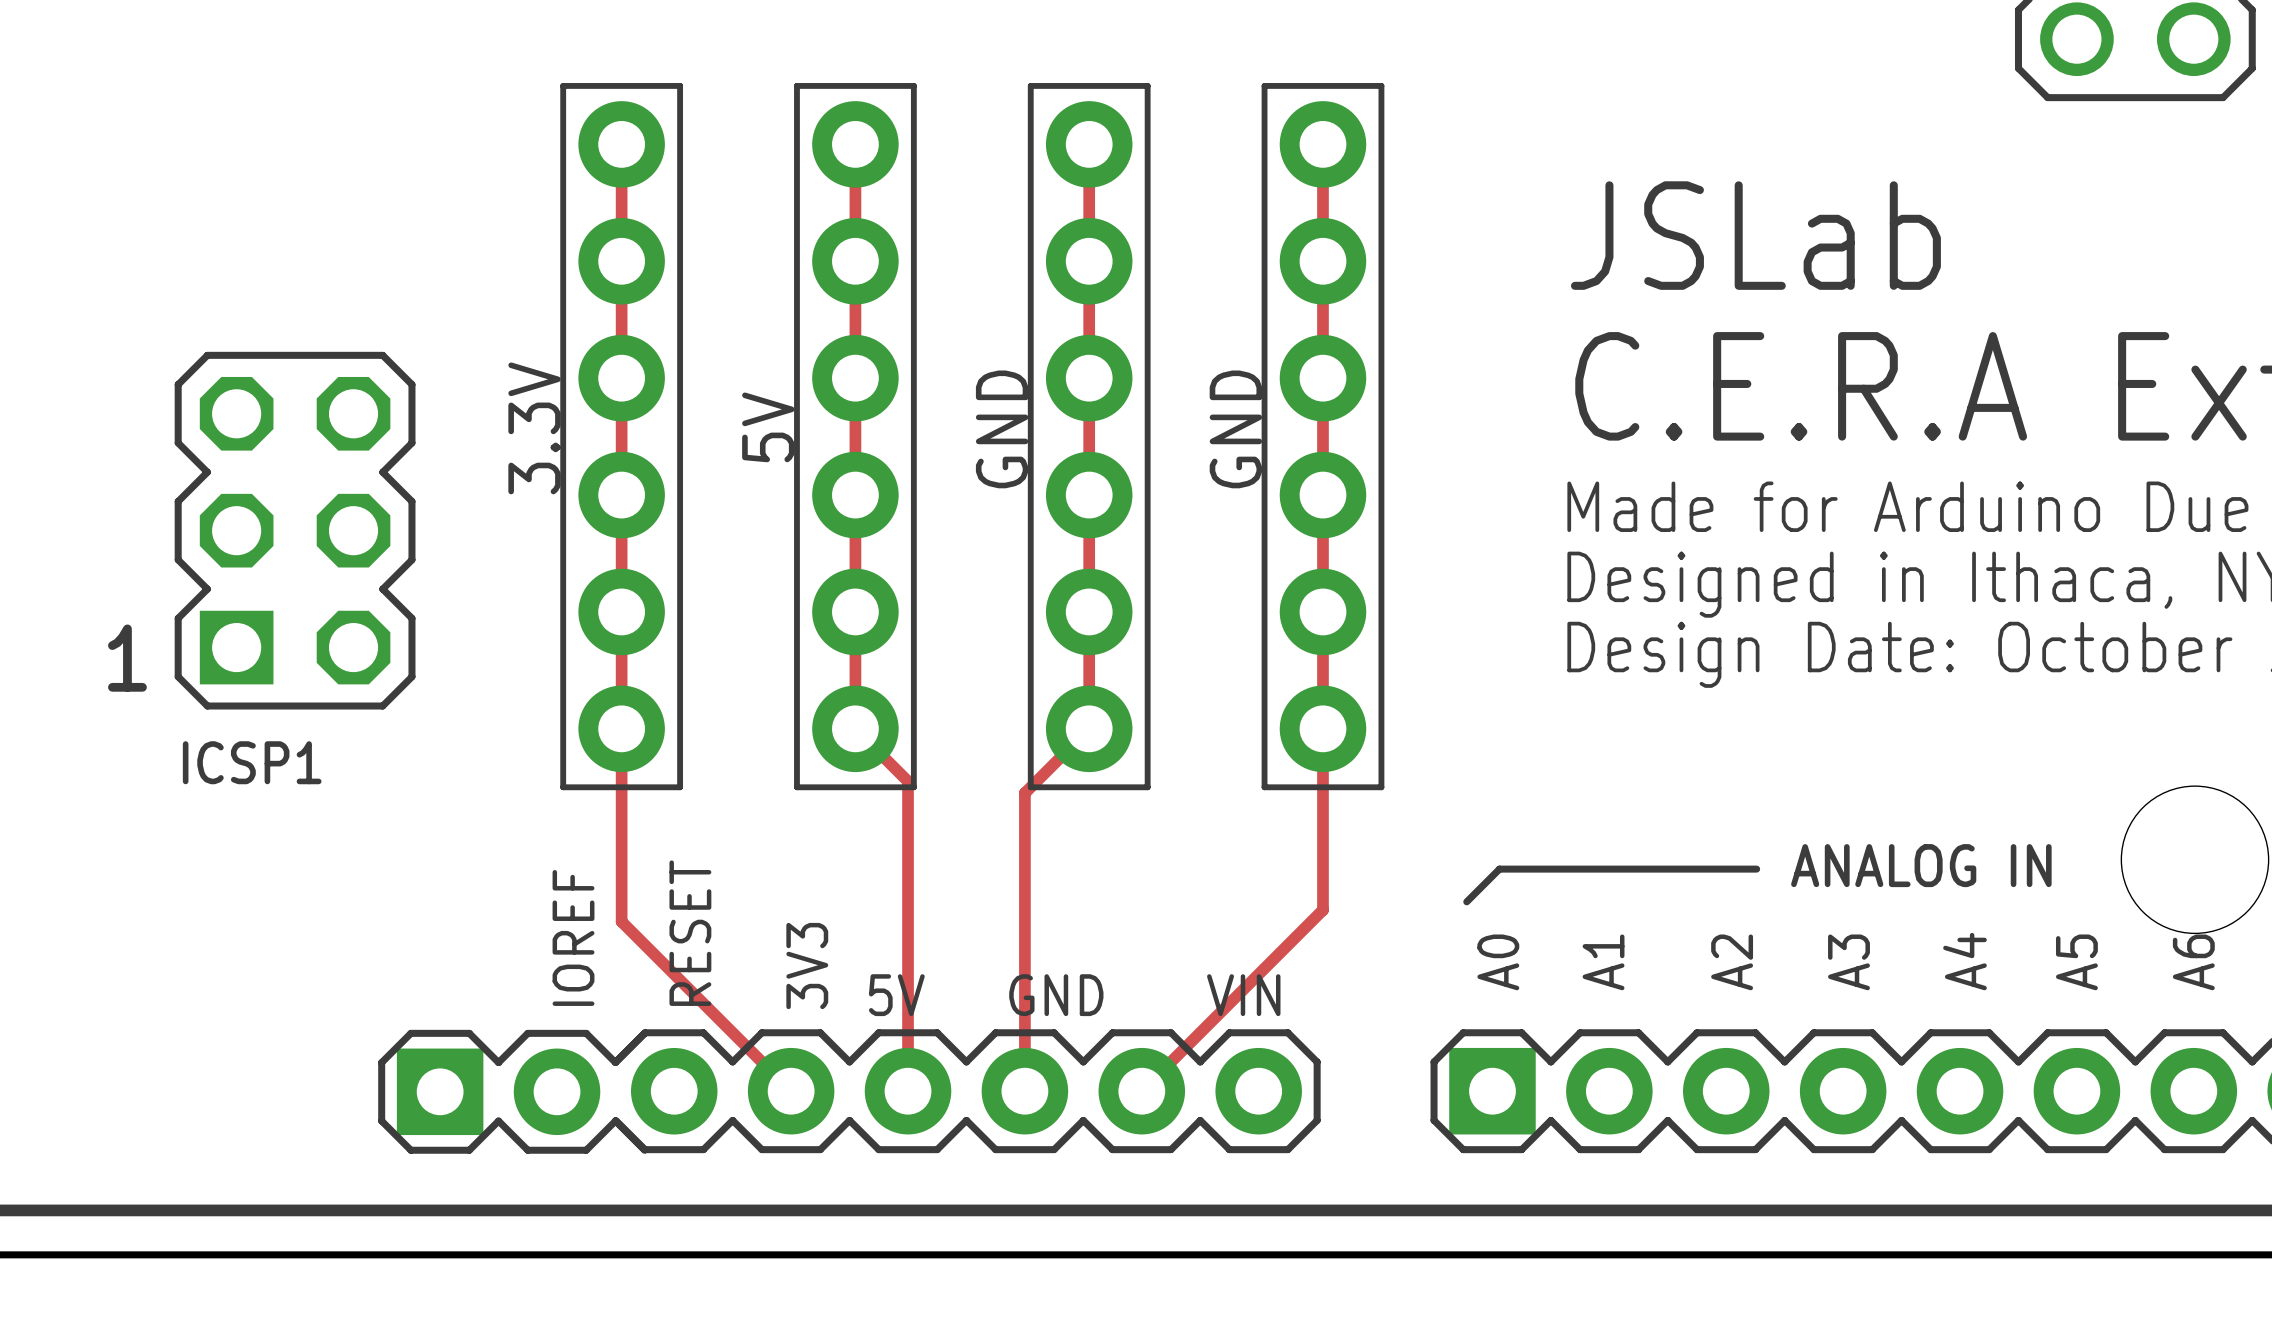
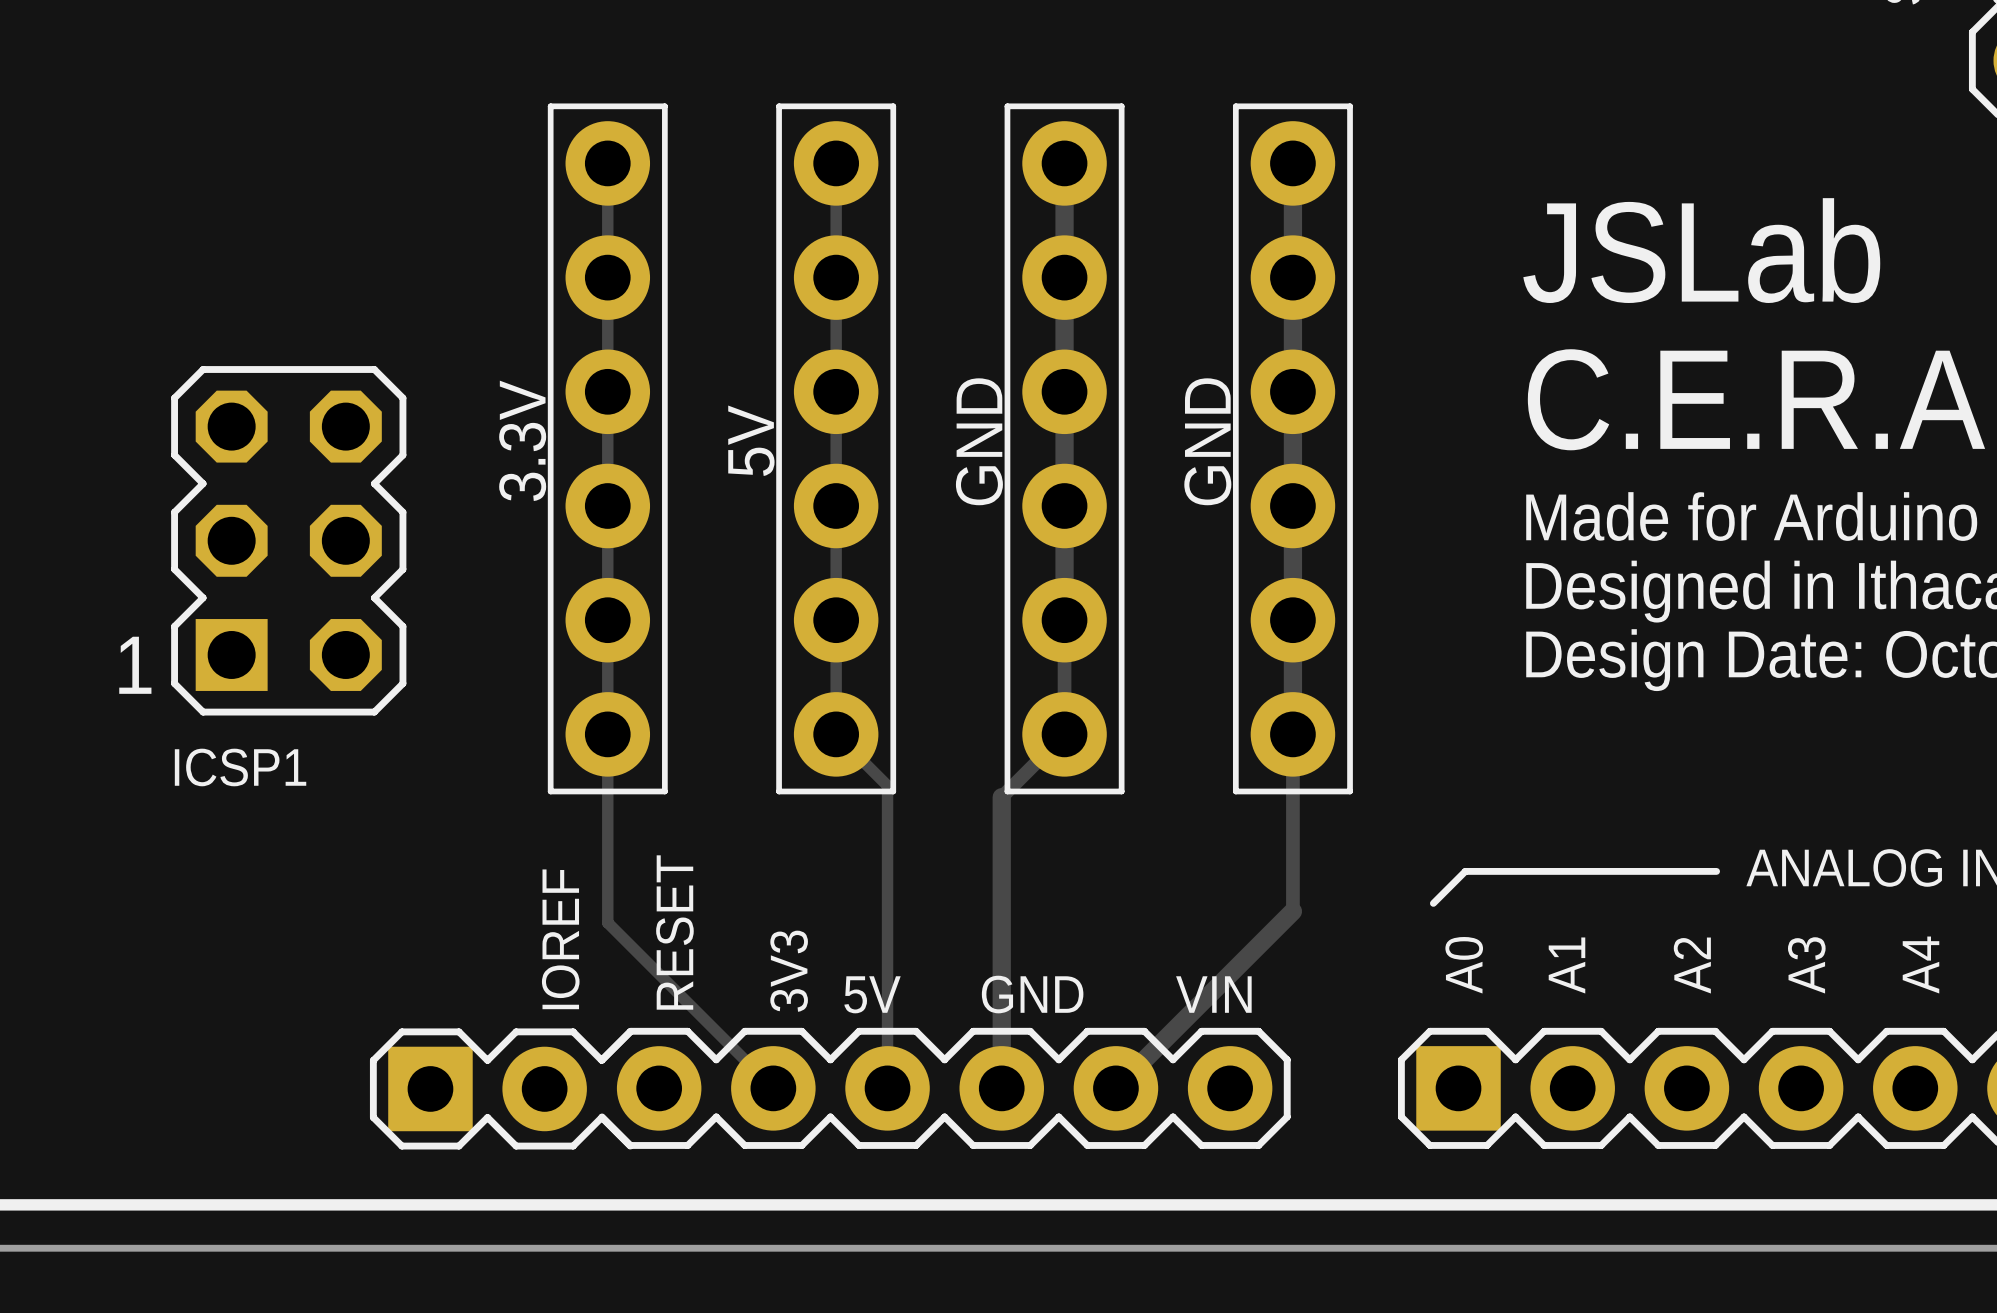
track width: thin (1089, 144) (1089, 728) (1024, 793) (1024, 1091) -> thick (1064, 163) (1064, 734) (1001, 797) (1001, 1088)
track width: thin (1322, 144) (1322, 910) (1141, 1091) -> thick (1292, 163) (1292, 911) (1115, 1088)

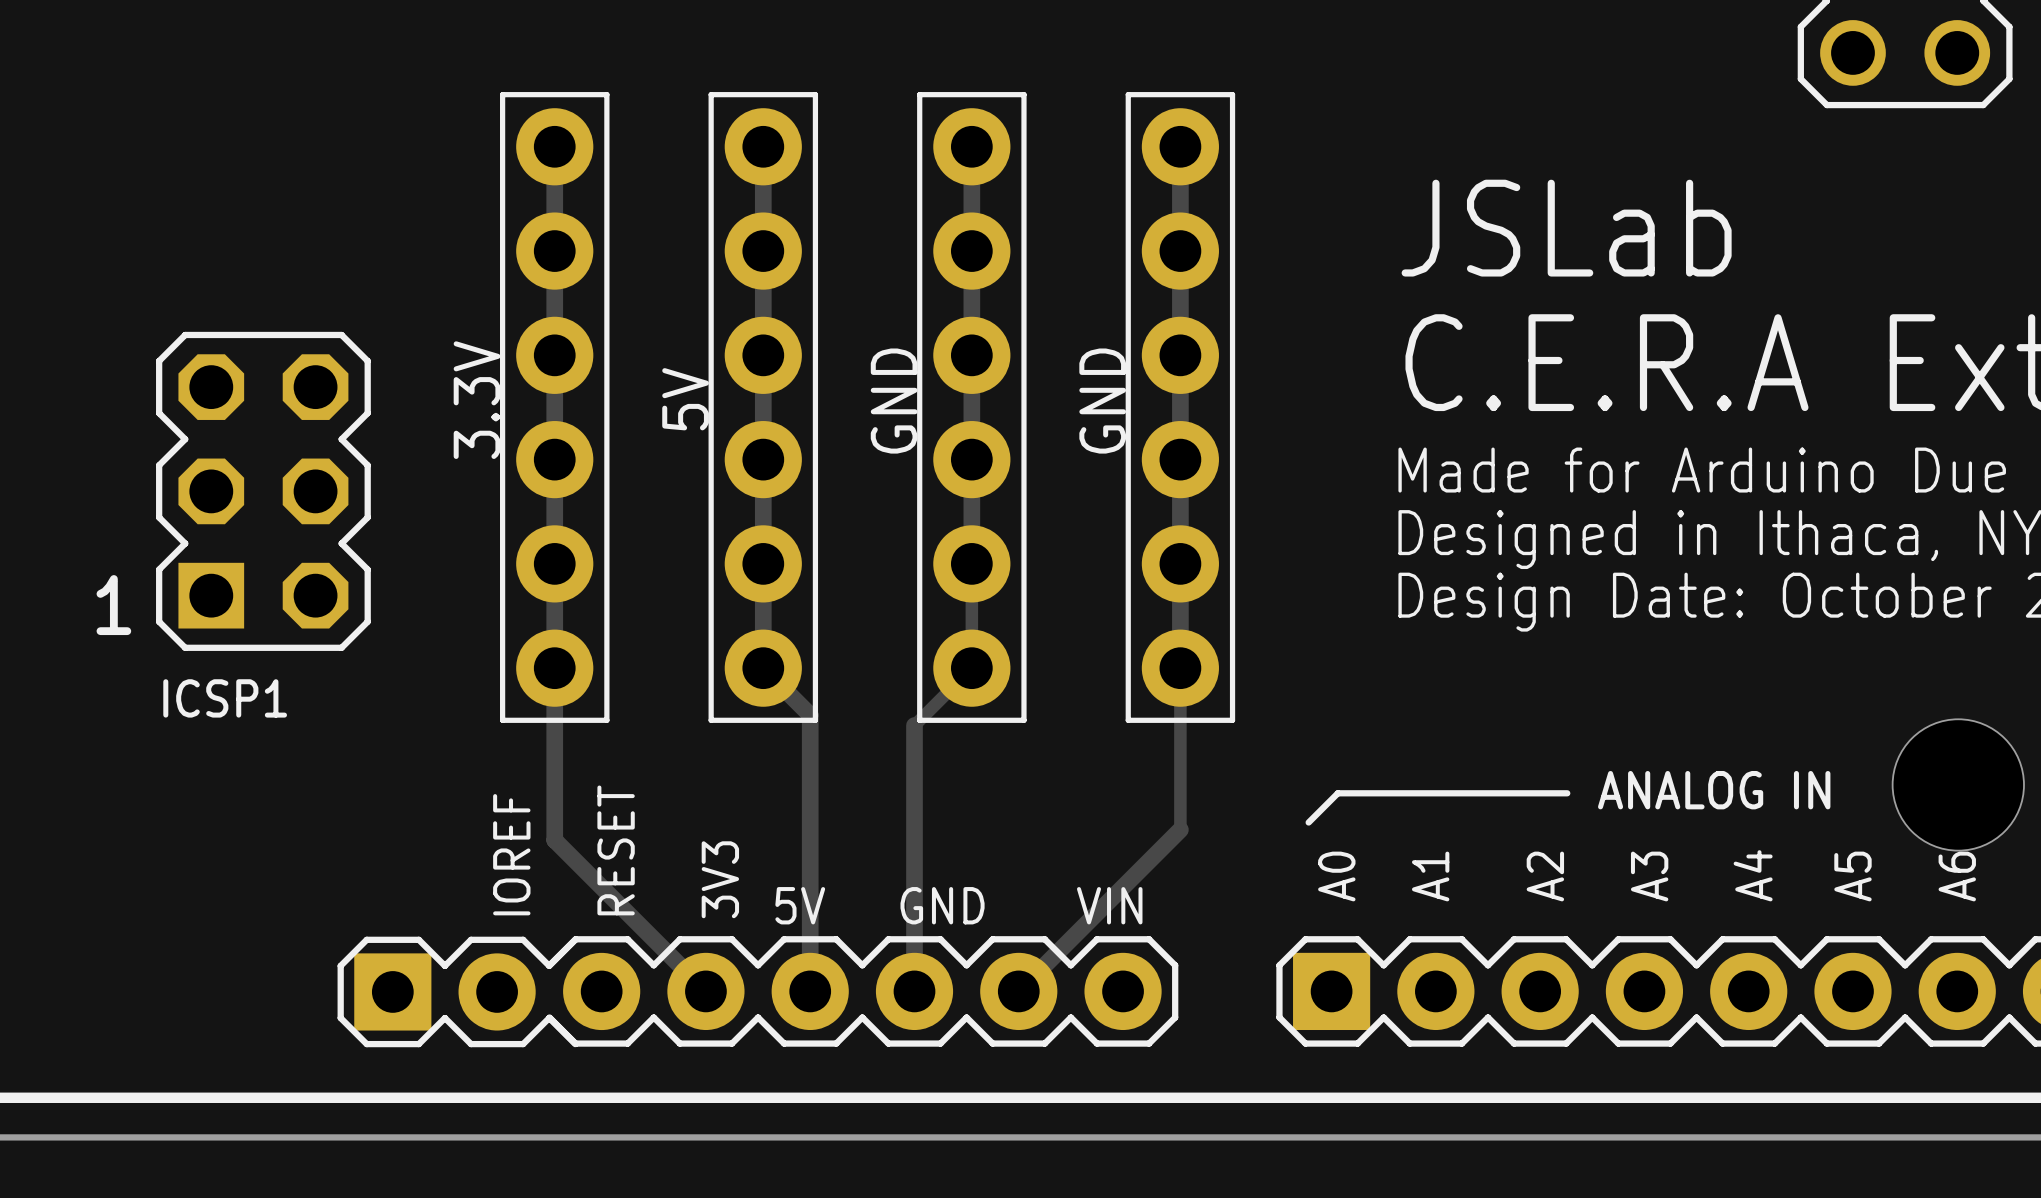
track width: thin (607, 163) (607, 922) (773, 1088) -> thick (554, 146) (554, 840) (705, 991)
track width: thin (836, 163) (836, 734) (887, 785) (887, 1088) -> thick (763, 146) (763, 668) (810, 715) (810, 991)

